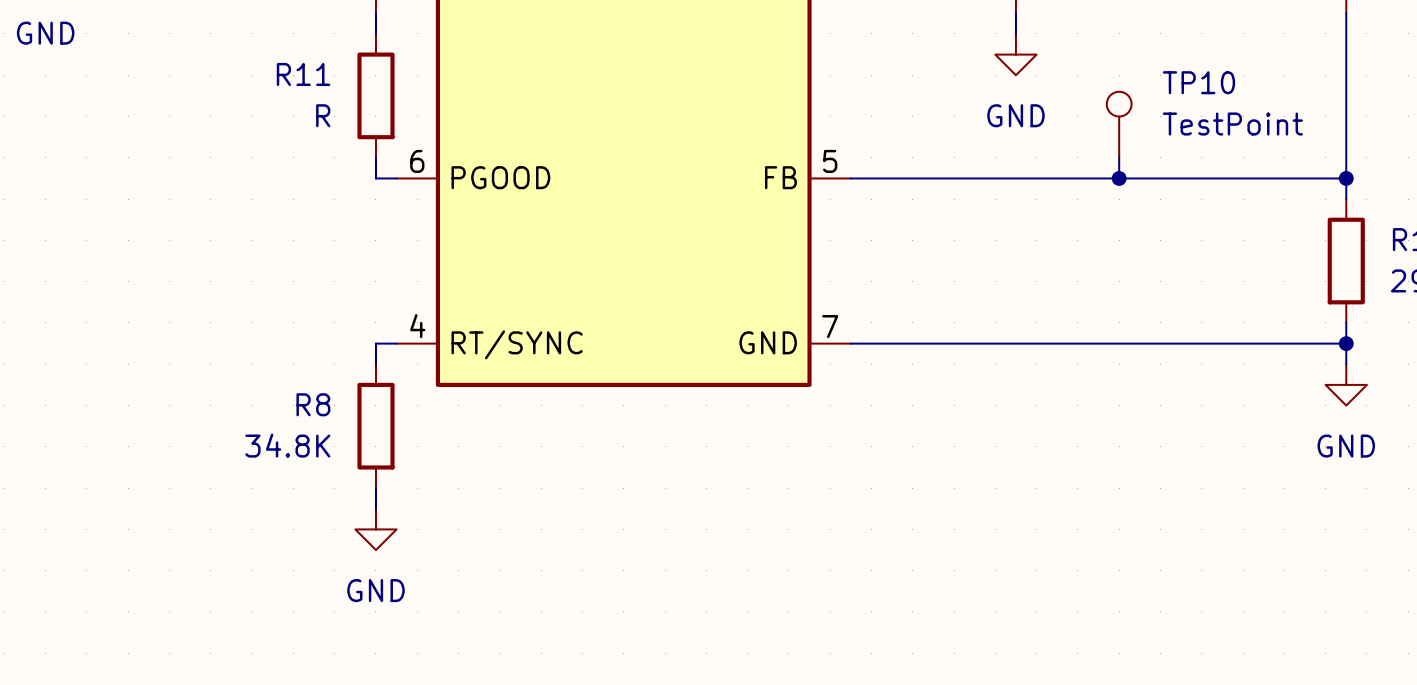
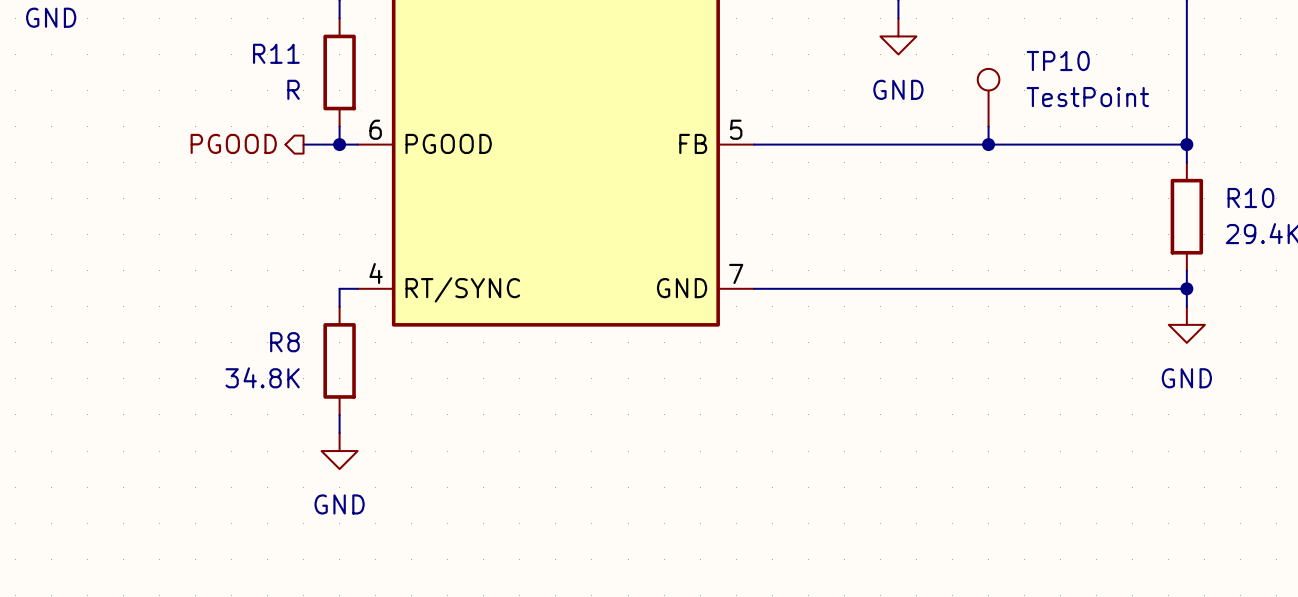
hierarchical label: none -> PGOOD (233, 143)
wire: none -> (303, 144) (339, 144)
junction: none -> (339, 144)

